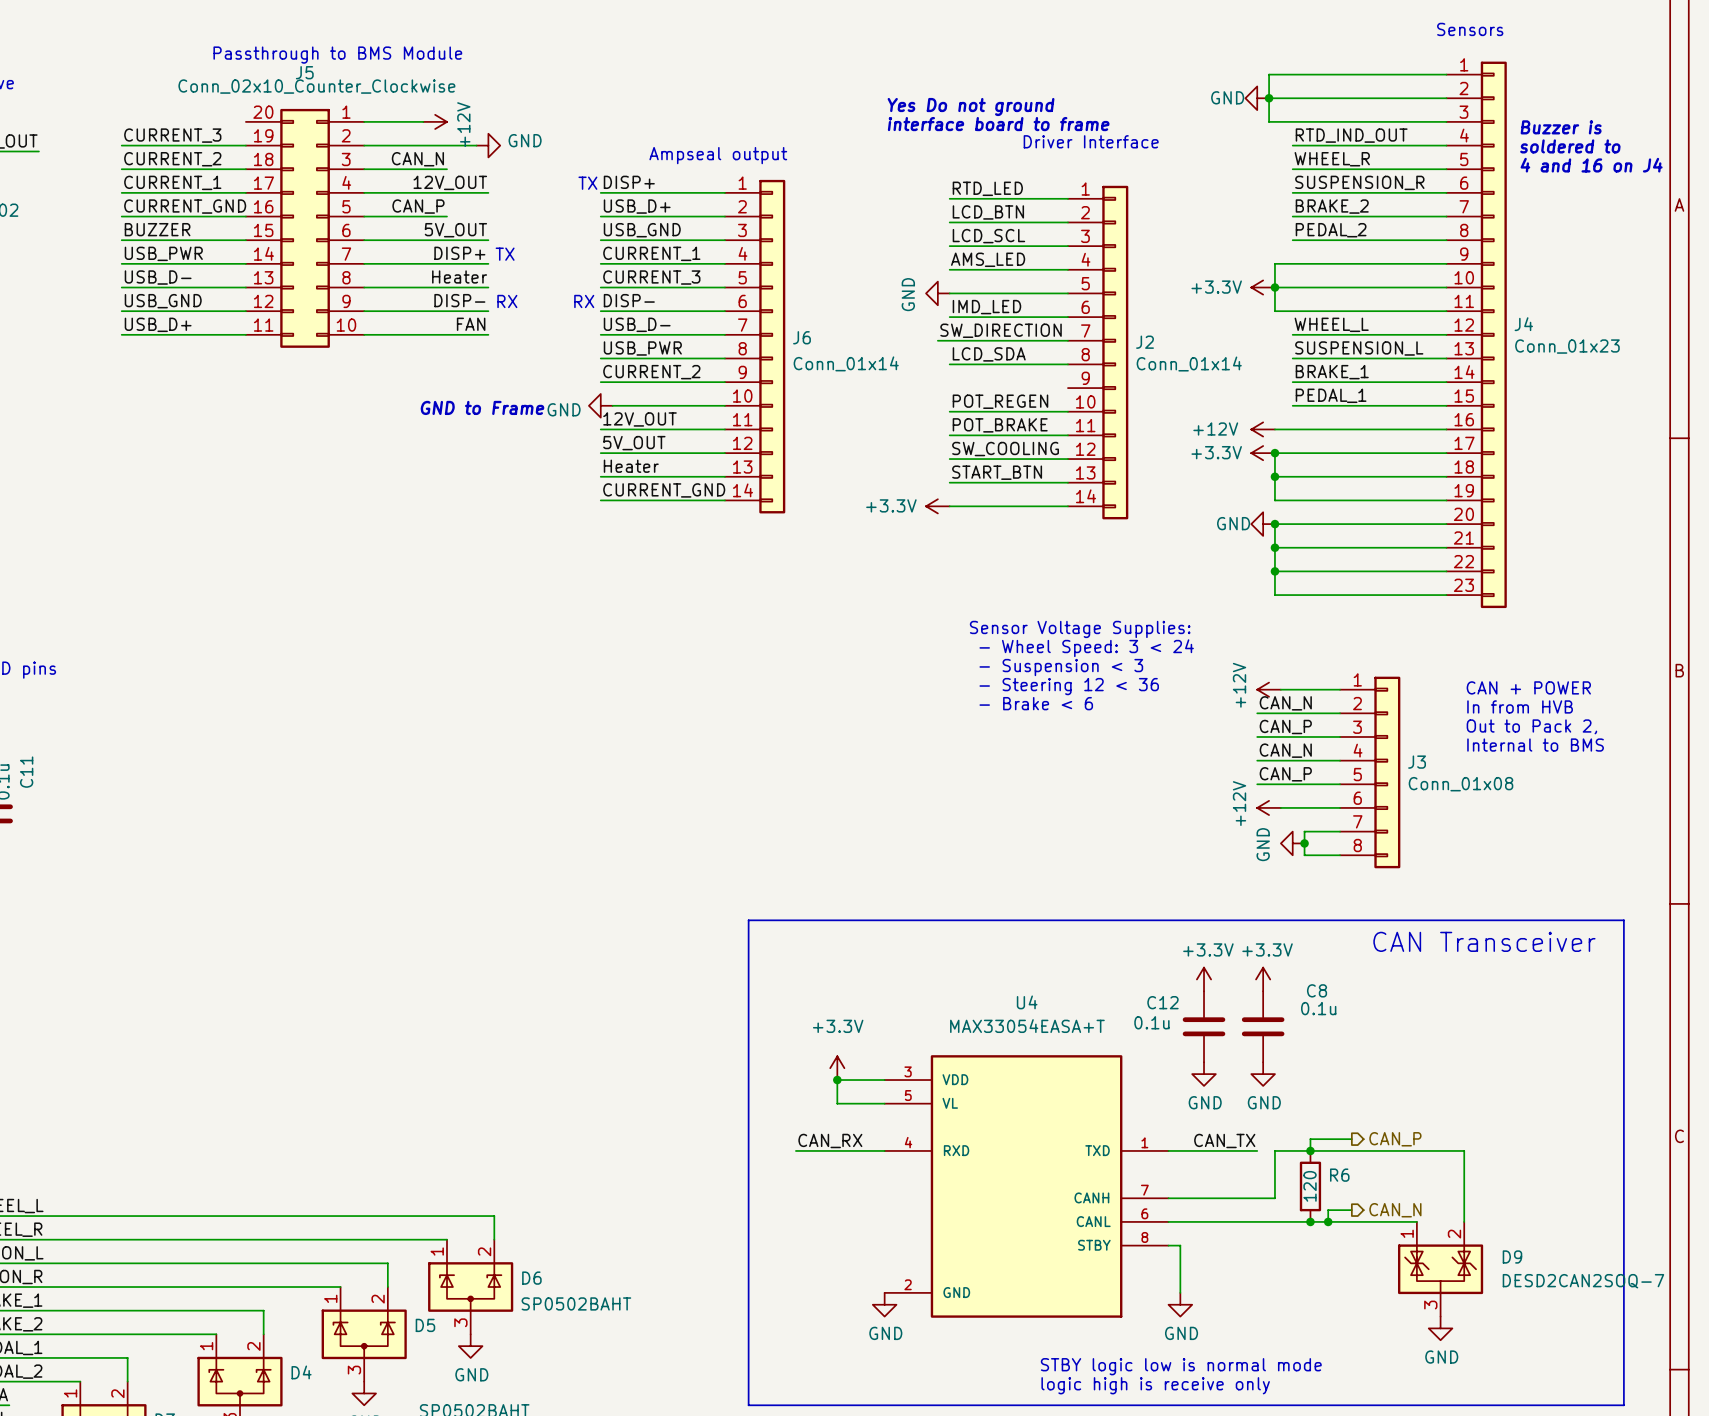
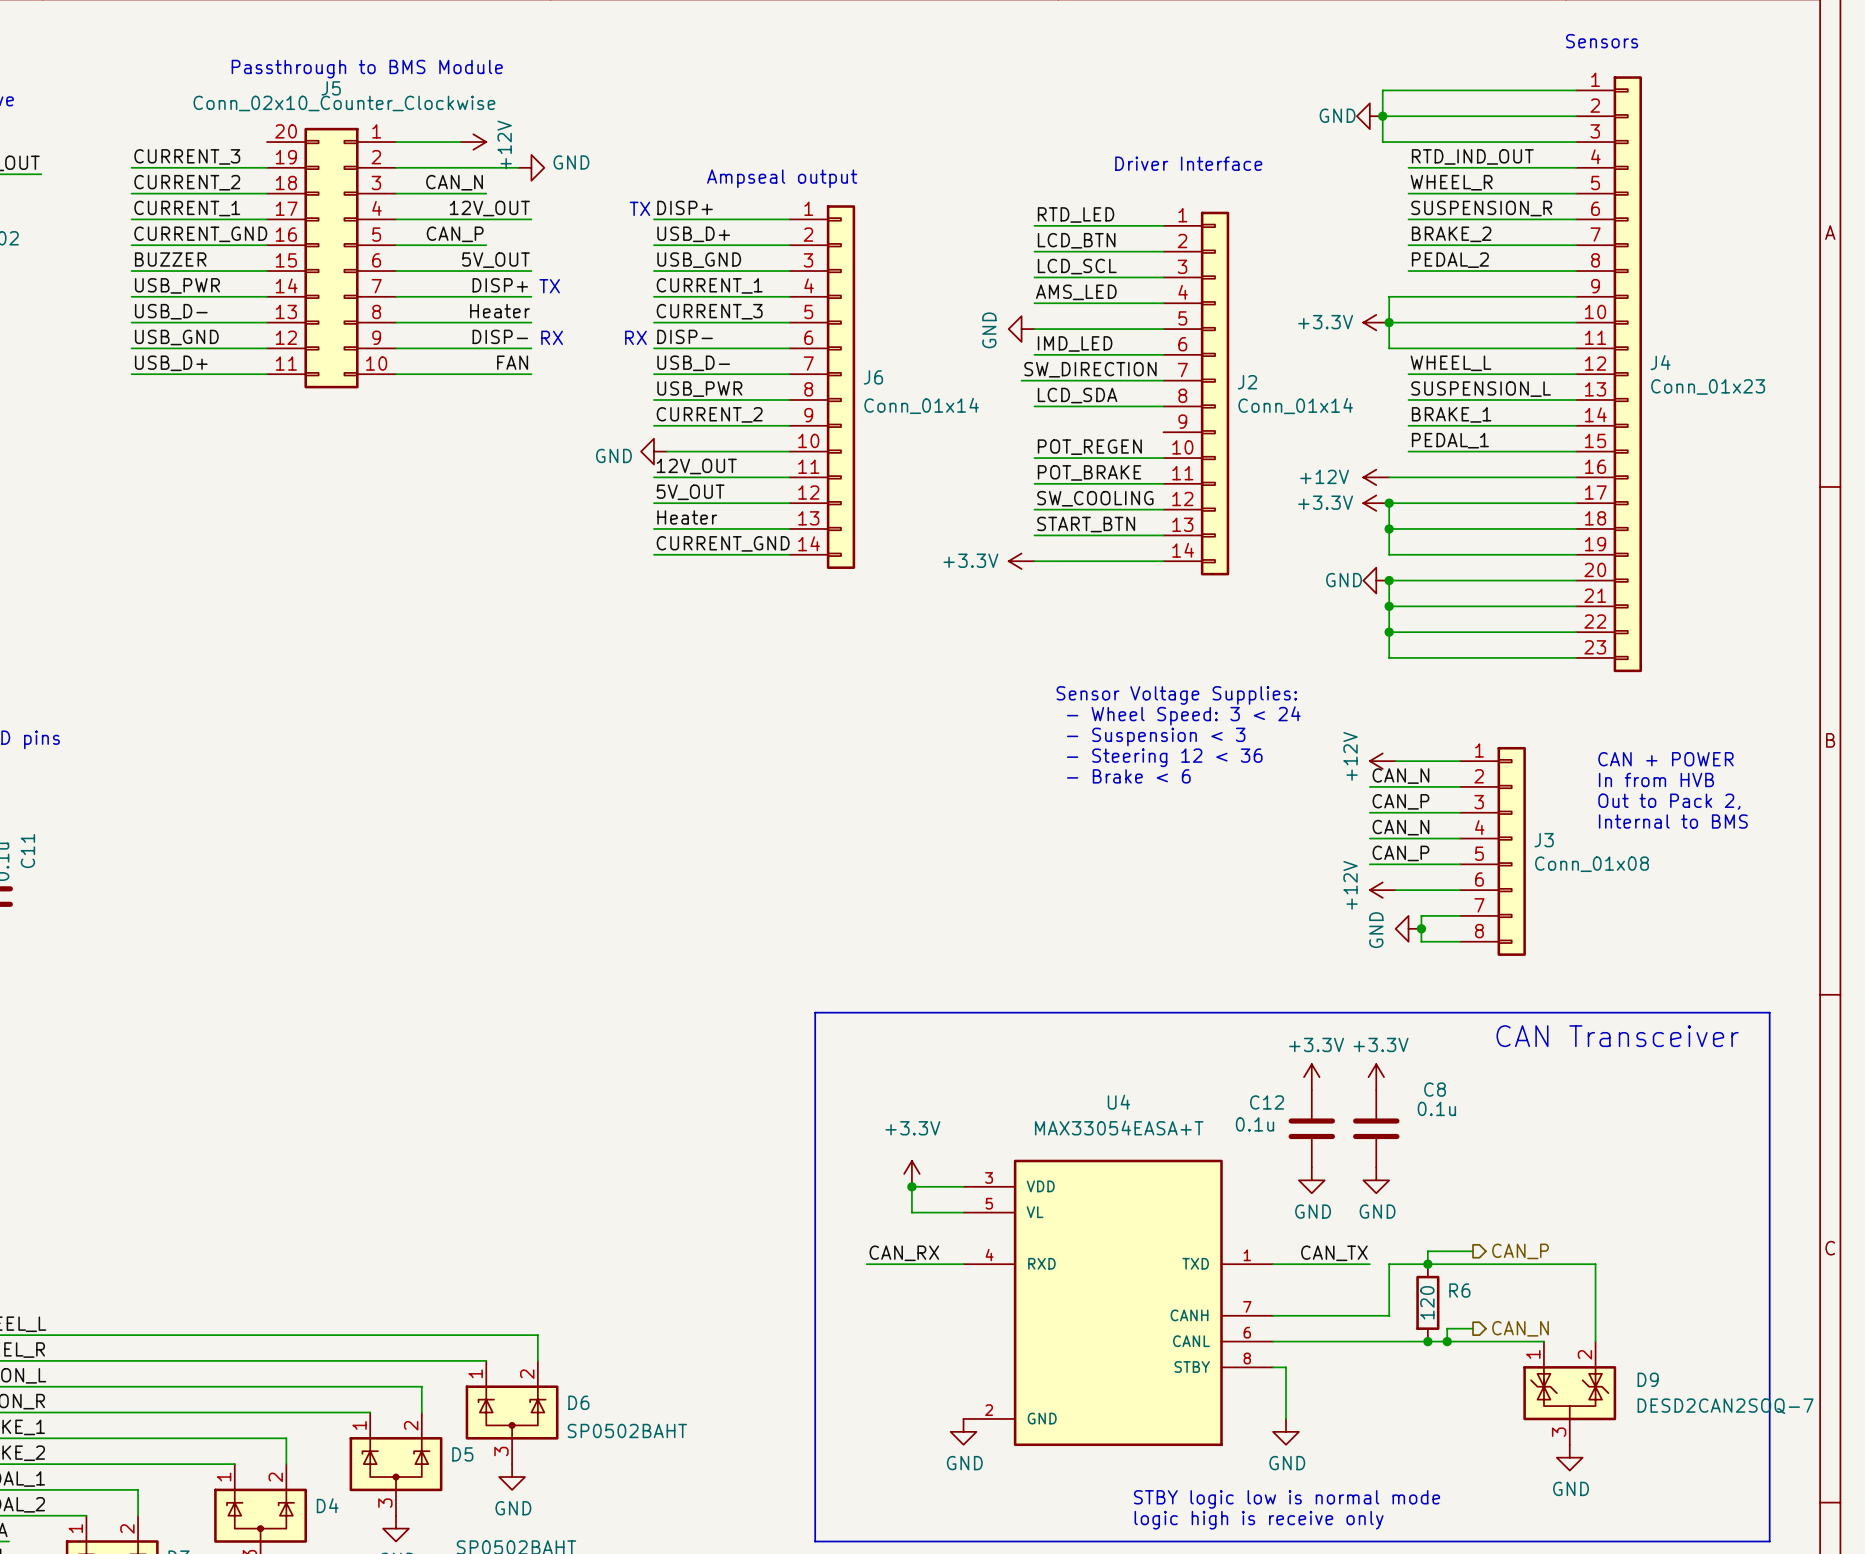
text: Yes Do not ground (971, 106) -> none
text: interface board to frame (998, 124) -> none
text: Buzzer is (1561, 127) -> none
text: soldered to (1570, 146) -> none
text: 4 and 16 on J4 (1591, 165) -> none
text: GND to Frame (482, 407) -> none

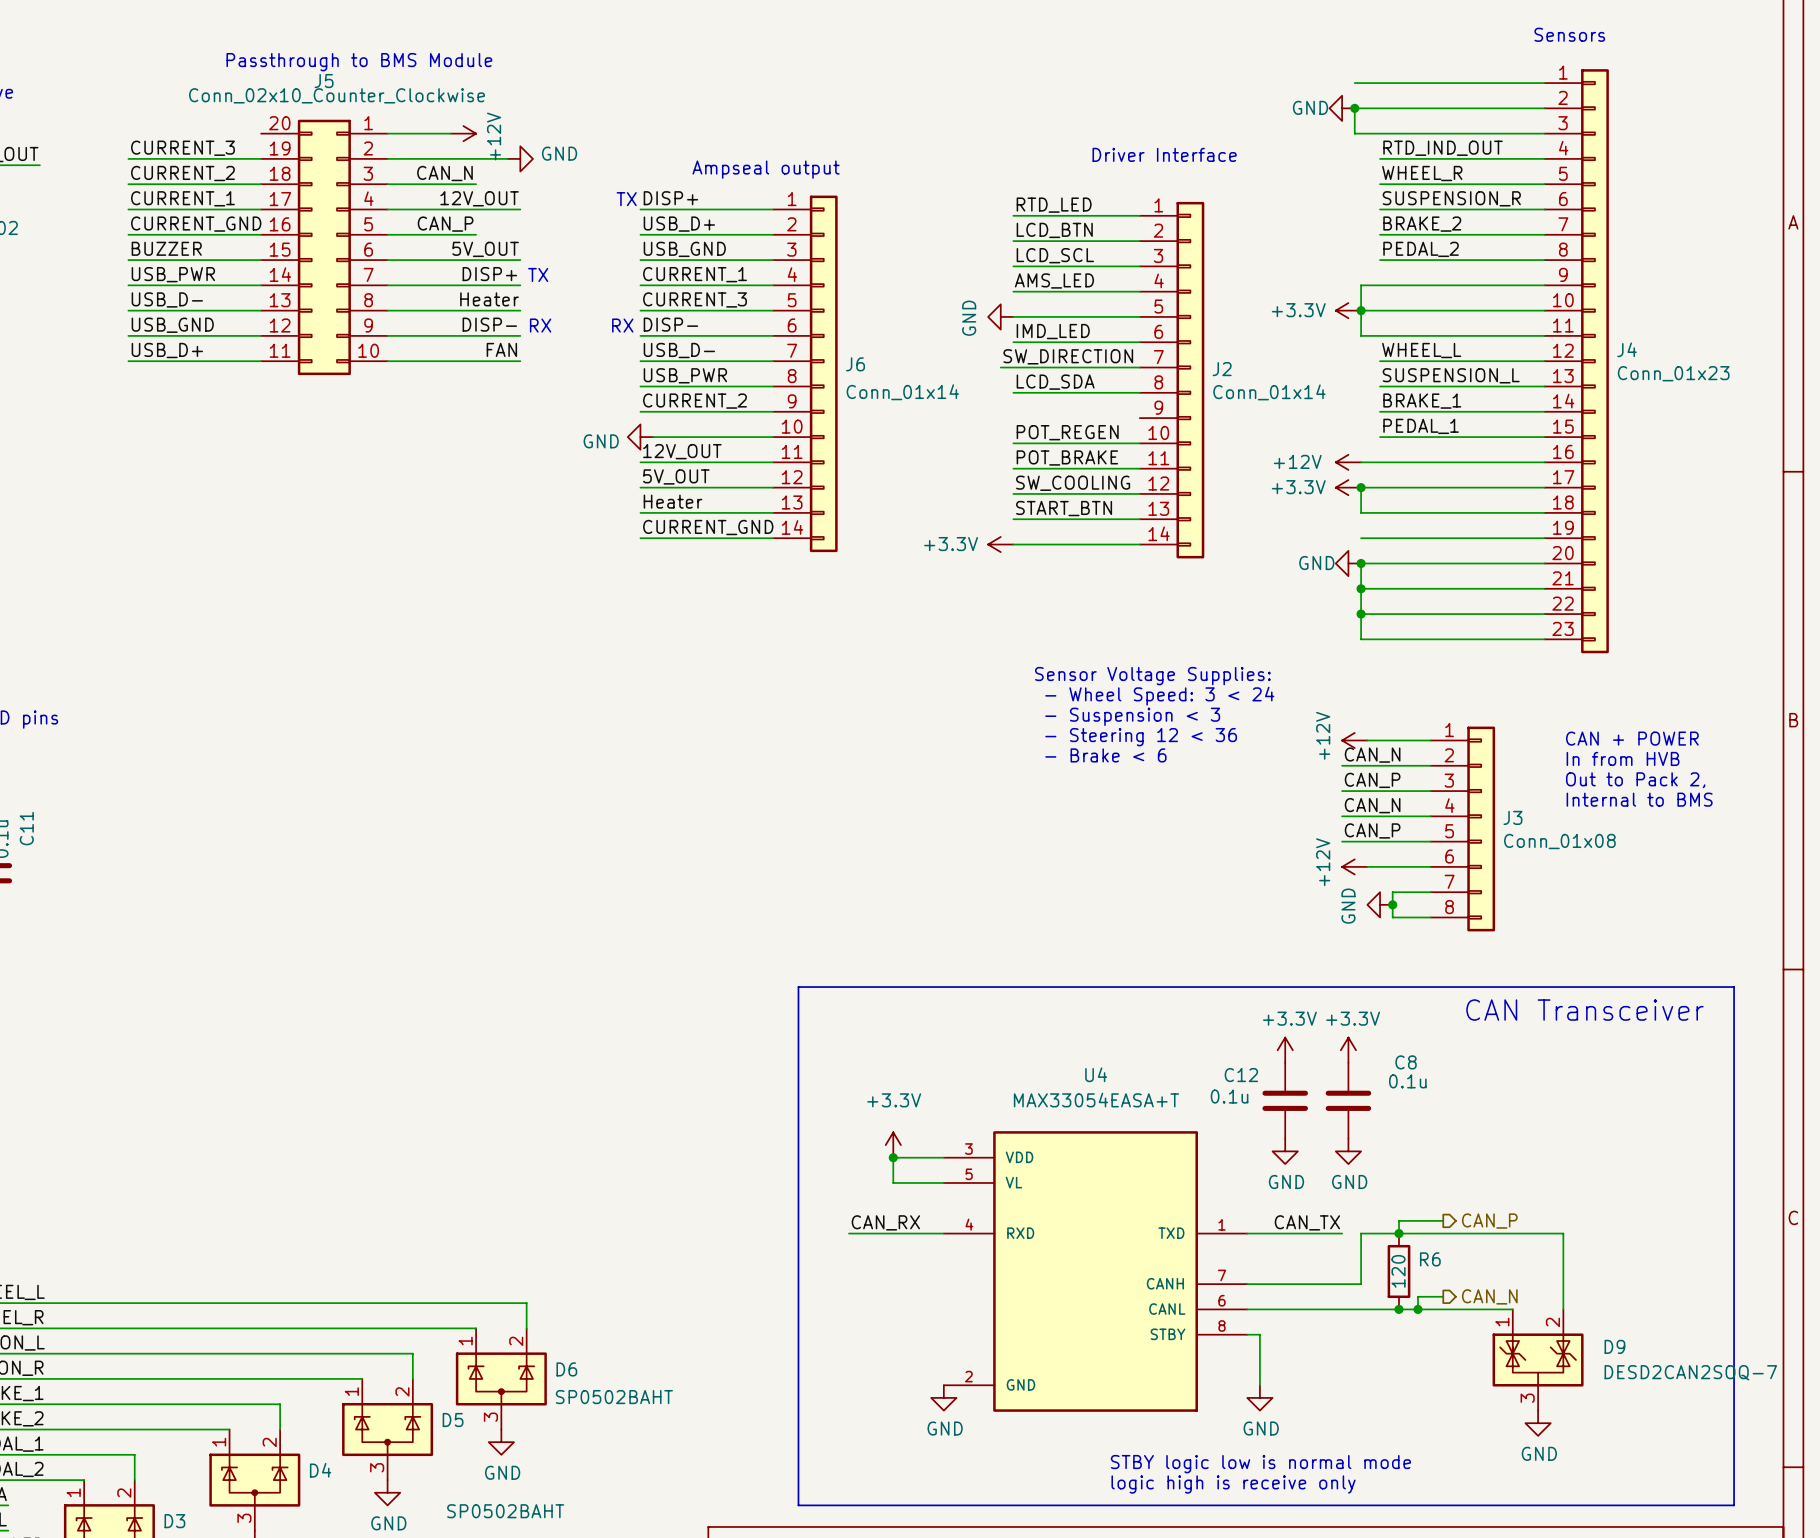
wire: (1382, 90) (1382, 116) -> none
wire: (1389, 528) (1389, 554) -> none
junction: (1389, 528) -> none

